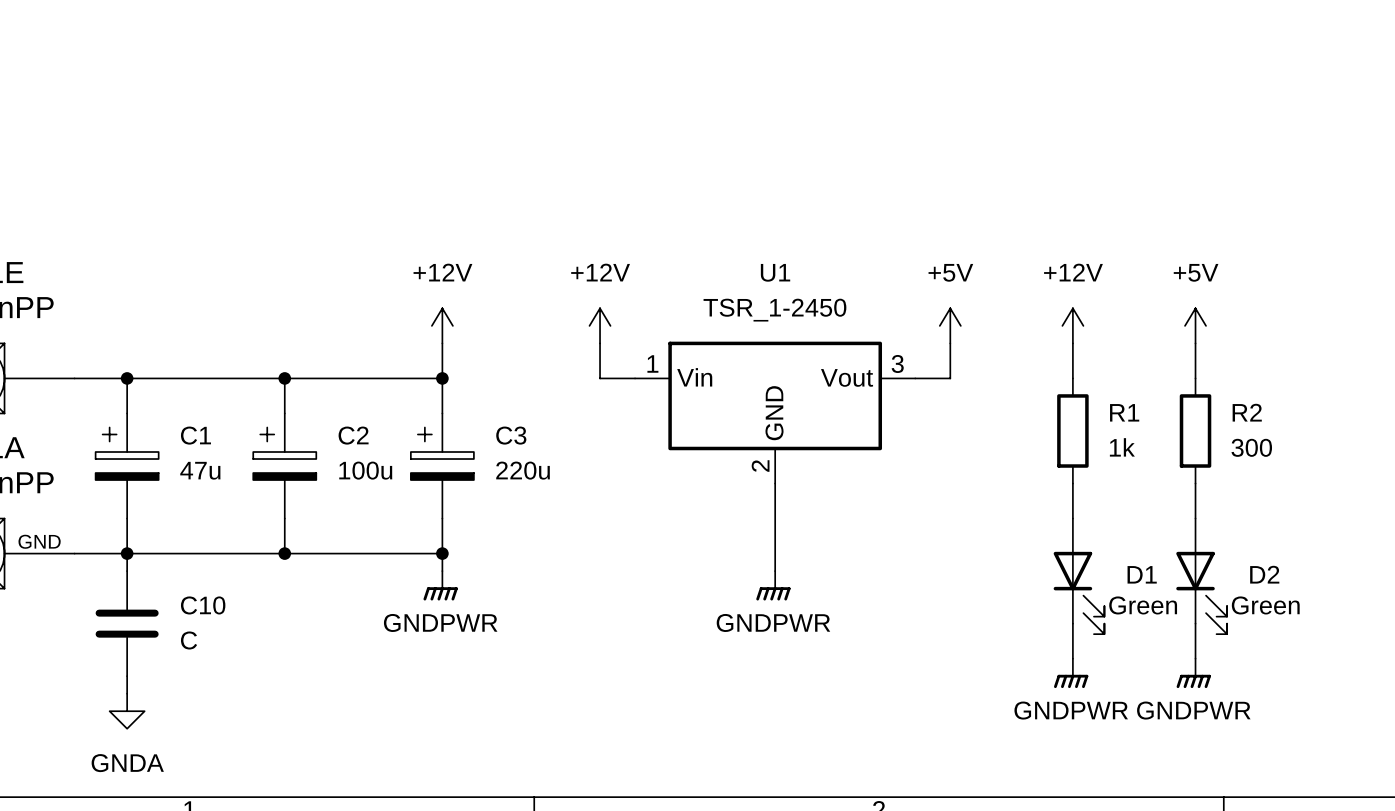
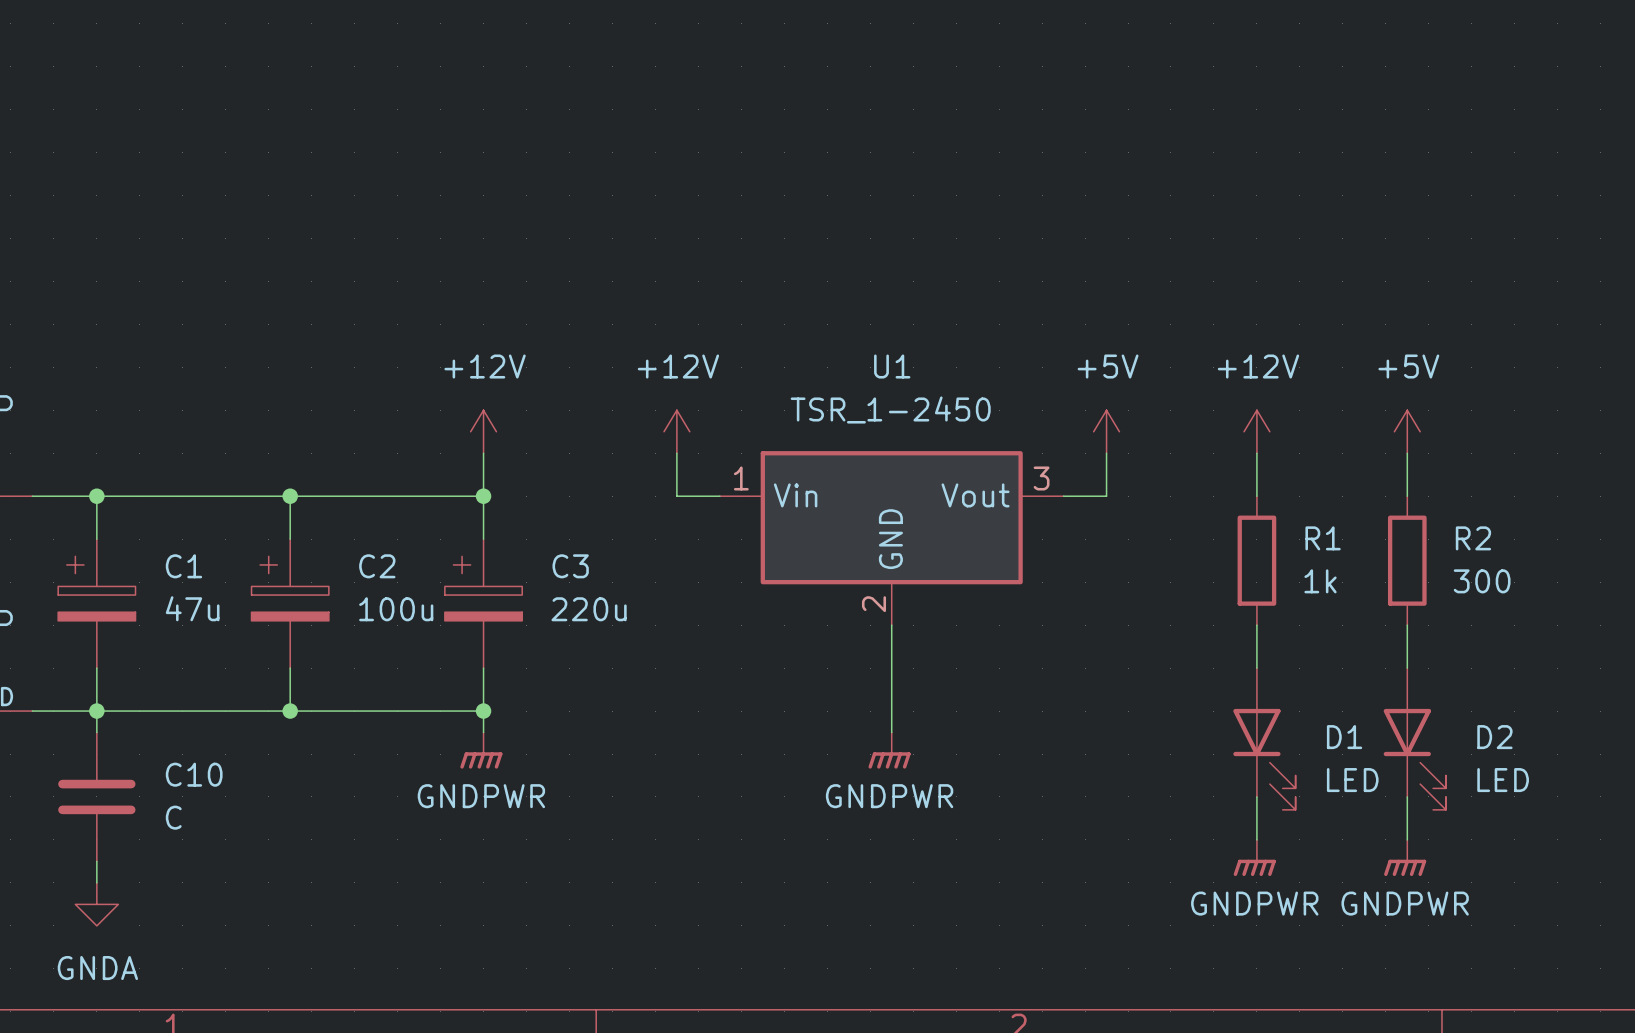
D1 value: Green (1143, 605) -> LED (1352, 780)
D2 value: Green (1265, 605) -> LED (1503, 780)

